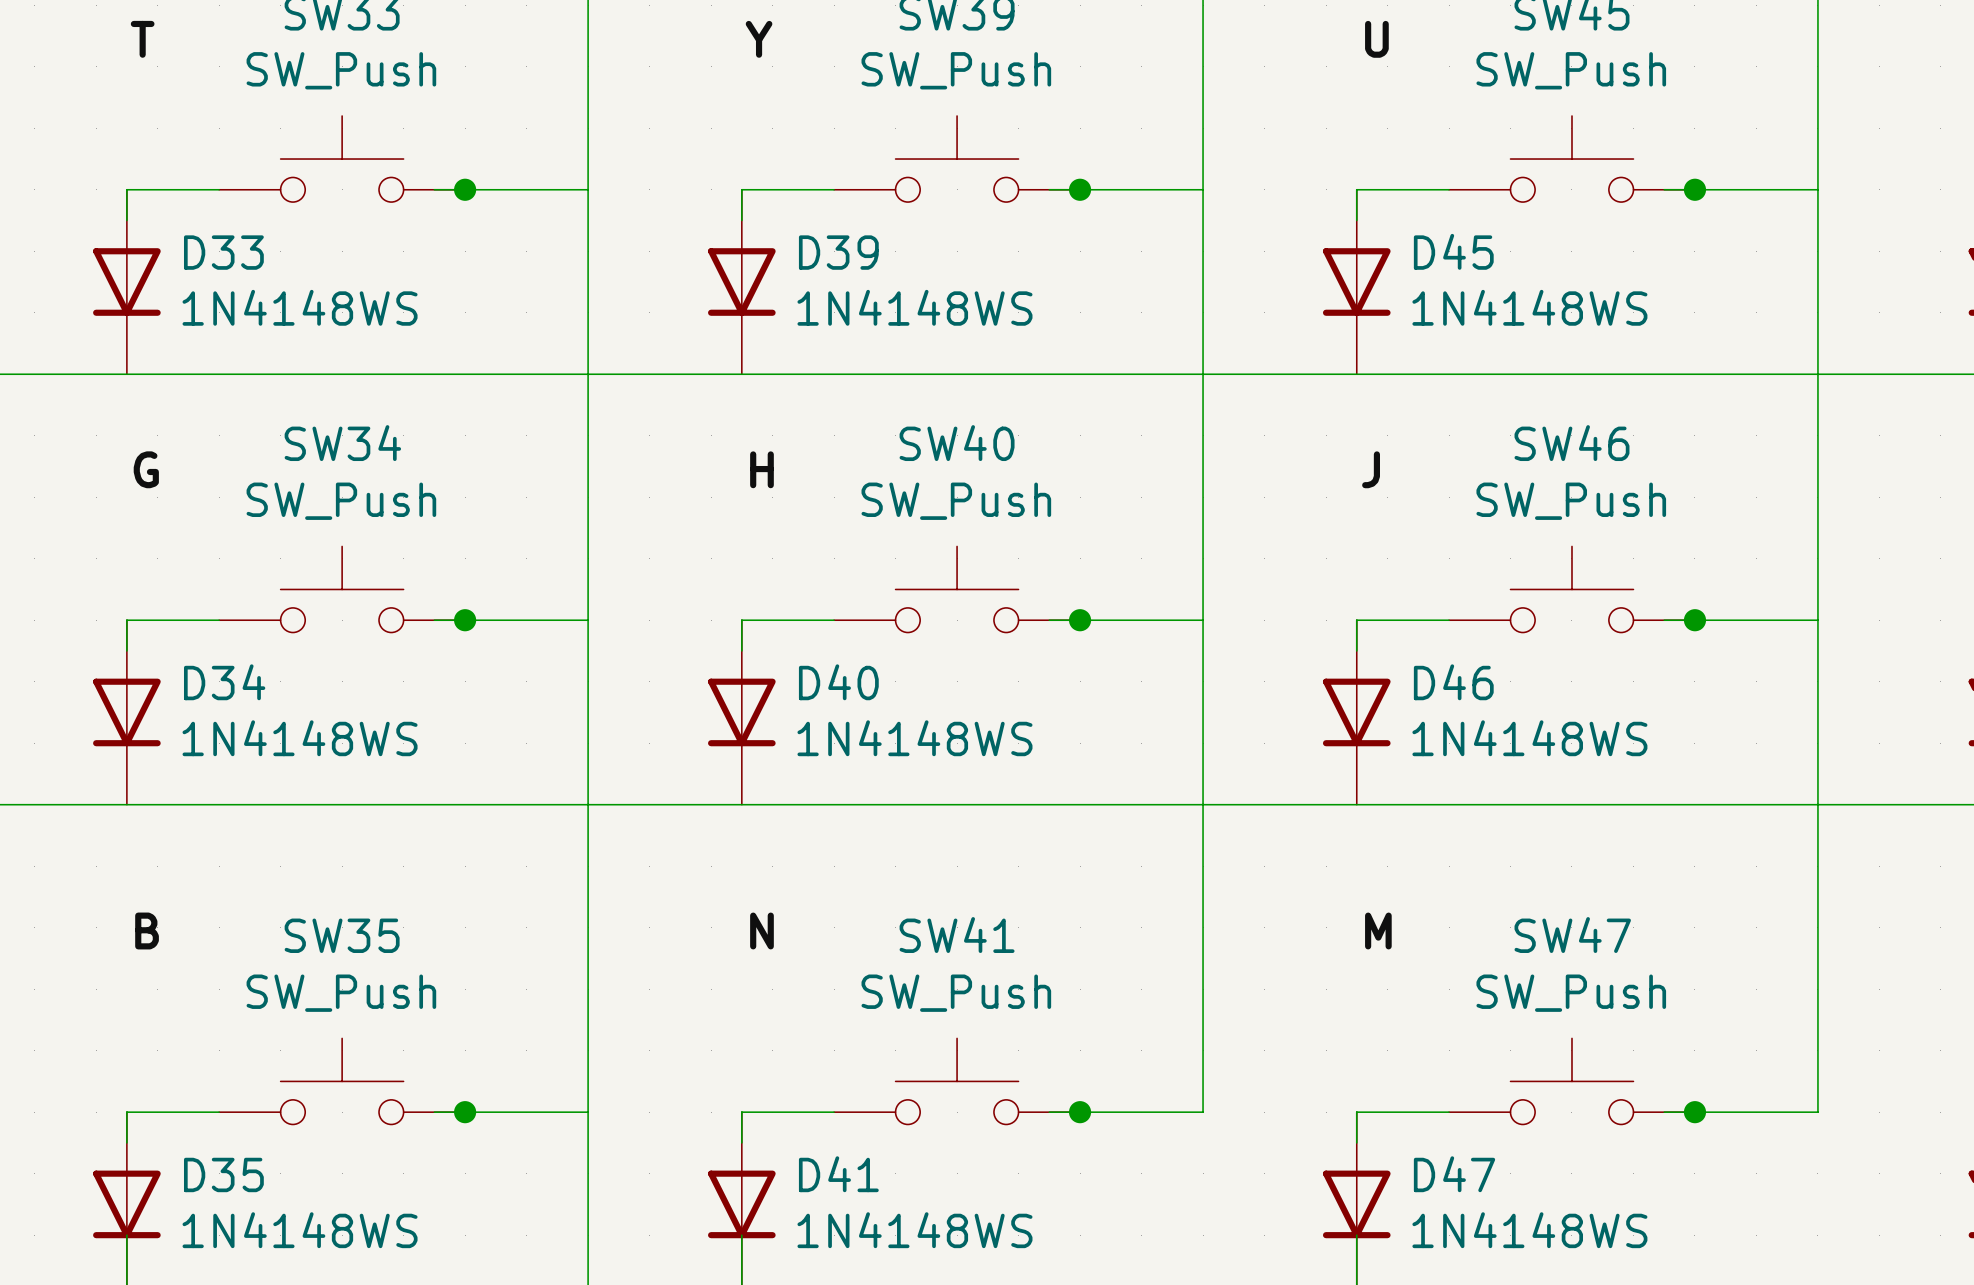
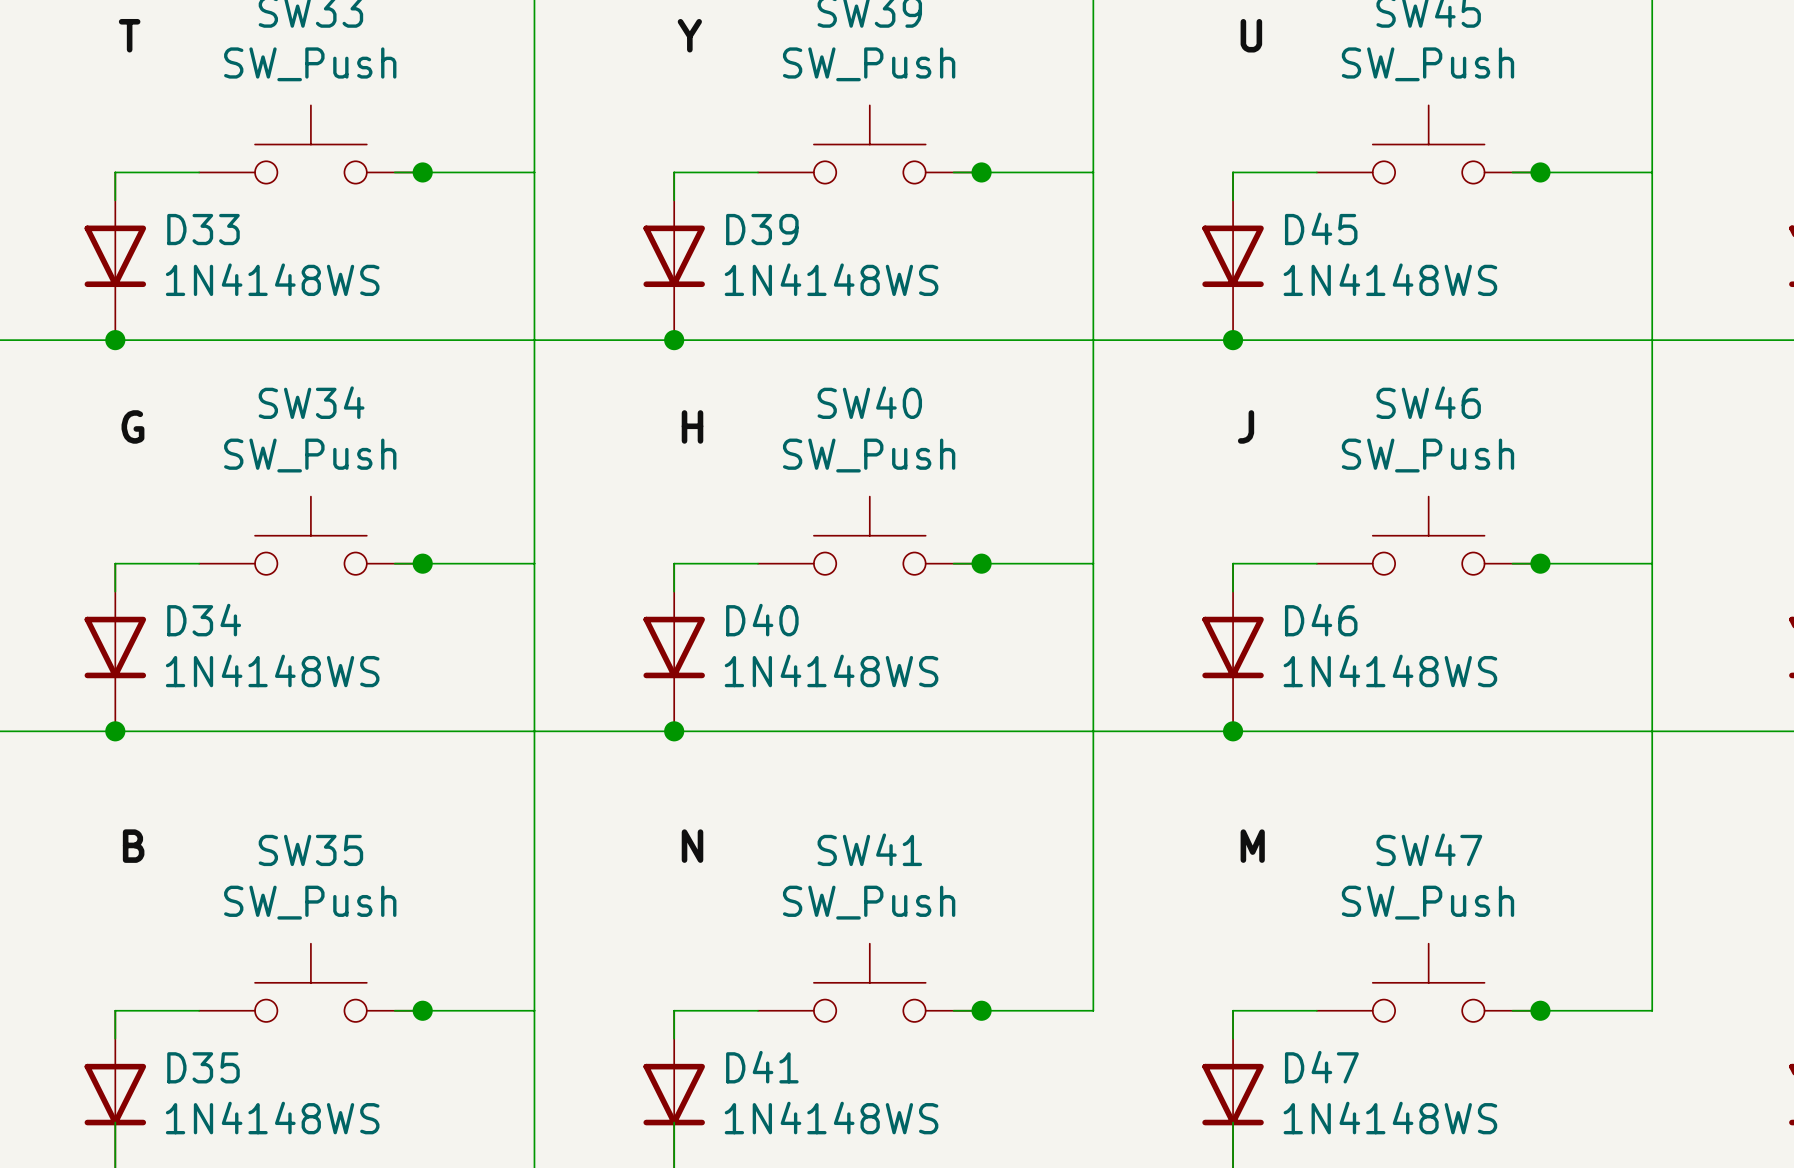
junction: none -> (115, 340)
junction: none -> (674, 340)
junction: none -> (1233, 340)
junction: none -> (115, 731)
junction: none -> (674, 731)
junction: none -> (1233, 731)

